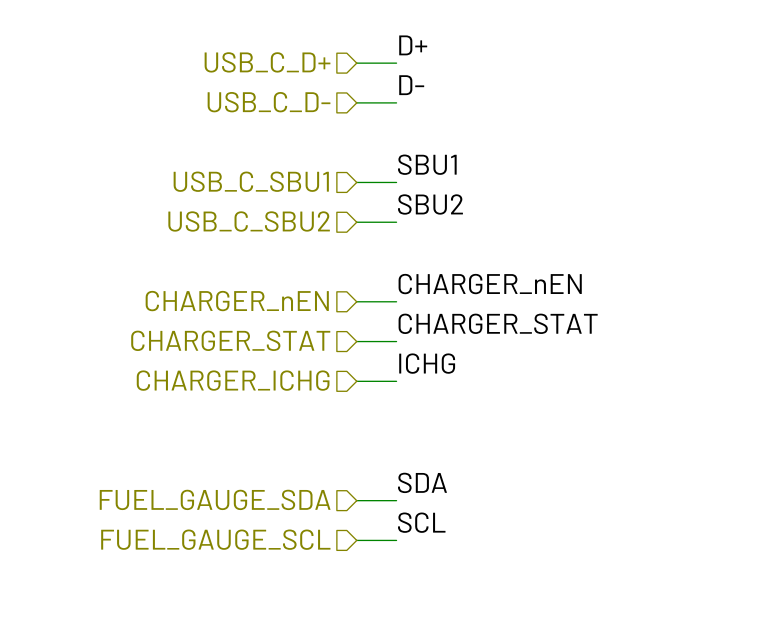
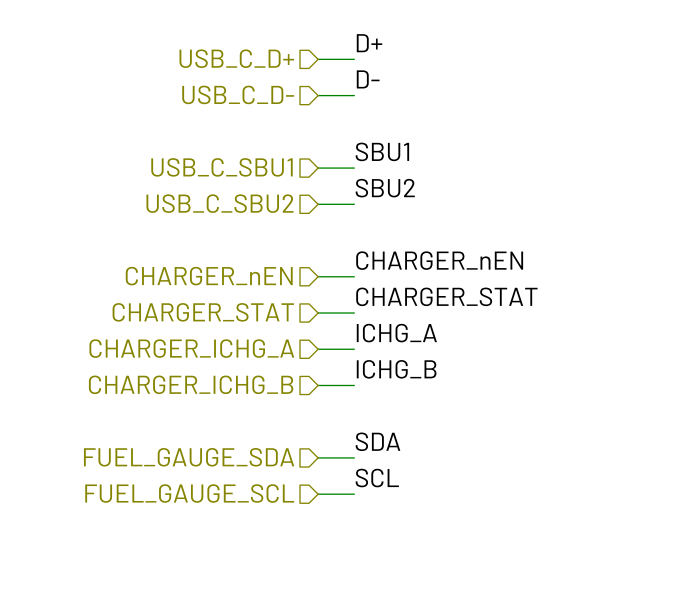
label: ICHG (427, 363) -> ICHG_A (396, 333)
hierarchical label: CHARGER_ICHG (233, 380) -> CHARGER_ICHG_A (191, 348)
label: none -> ICHG_B (396, 369)
hierarchical label: none -> CHARGER_ICHG_B (191, 384)
wire: none -> (318, 385) (354, 385)

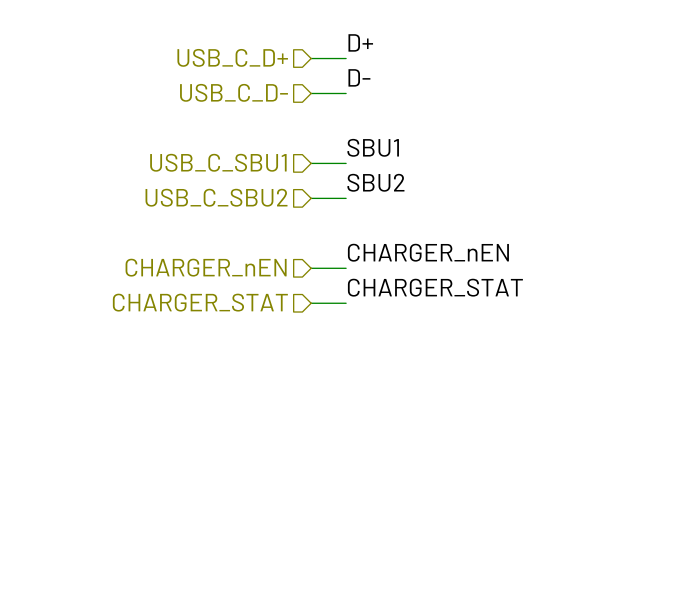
label: ICHG_A (396, 333) -> none
hierarchical label: CHARGER_ICHG_A (191, 348) -> none
wire: (318, 349) (354, 349) -> none
label: ICHG_B (396, 369) -> none
hierarchical label: CHARGER_ICHG_B (191, 384) -> none
wire: (318, 385) (354, 385) -> none
label: SDA (377, 441) -> none
hierarchical label: FUEL_GAUGE_SDA (189, 457) -> none
wire: (318, 457) (354, 457) -> none
label: SCL (377, 478) -> none
hierarchical label: FUEL_GAUGE_SCL (189, 493) -> none
wire: (318, 494) (354, 494) -> none

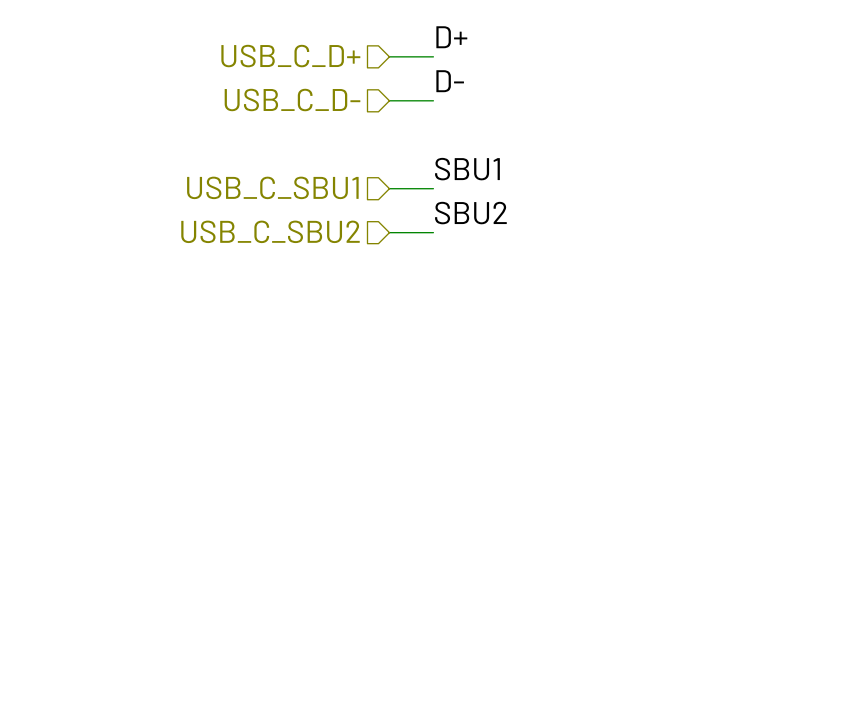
label: CHARGER_nEN (428, 252) -> none
hierarchical label: CHARGER_nEN (206, 267) -> none
wire: (311, 268) (346, 268) -> none
label: CHARGER_STAT (435, 287) -> none
hierarchical label: CHARGER_STAT (200, 302) -> none
wire: (311, 303) (346, 303) -> none

